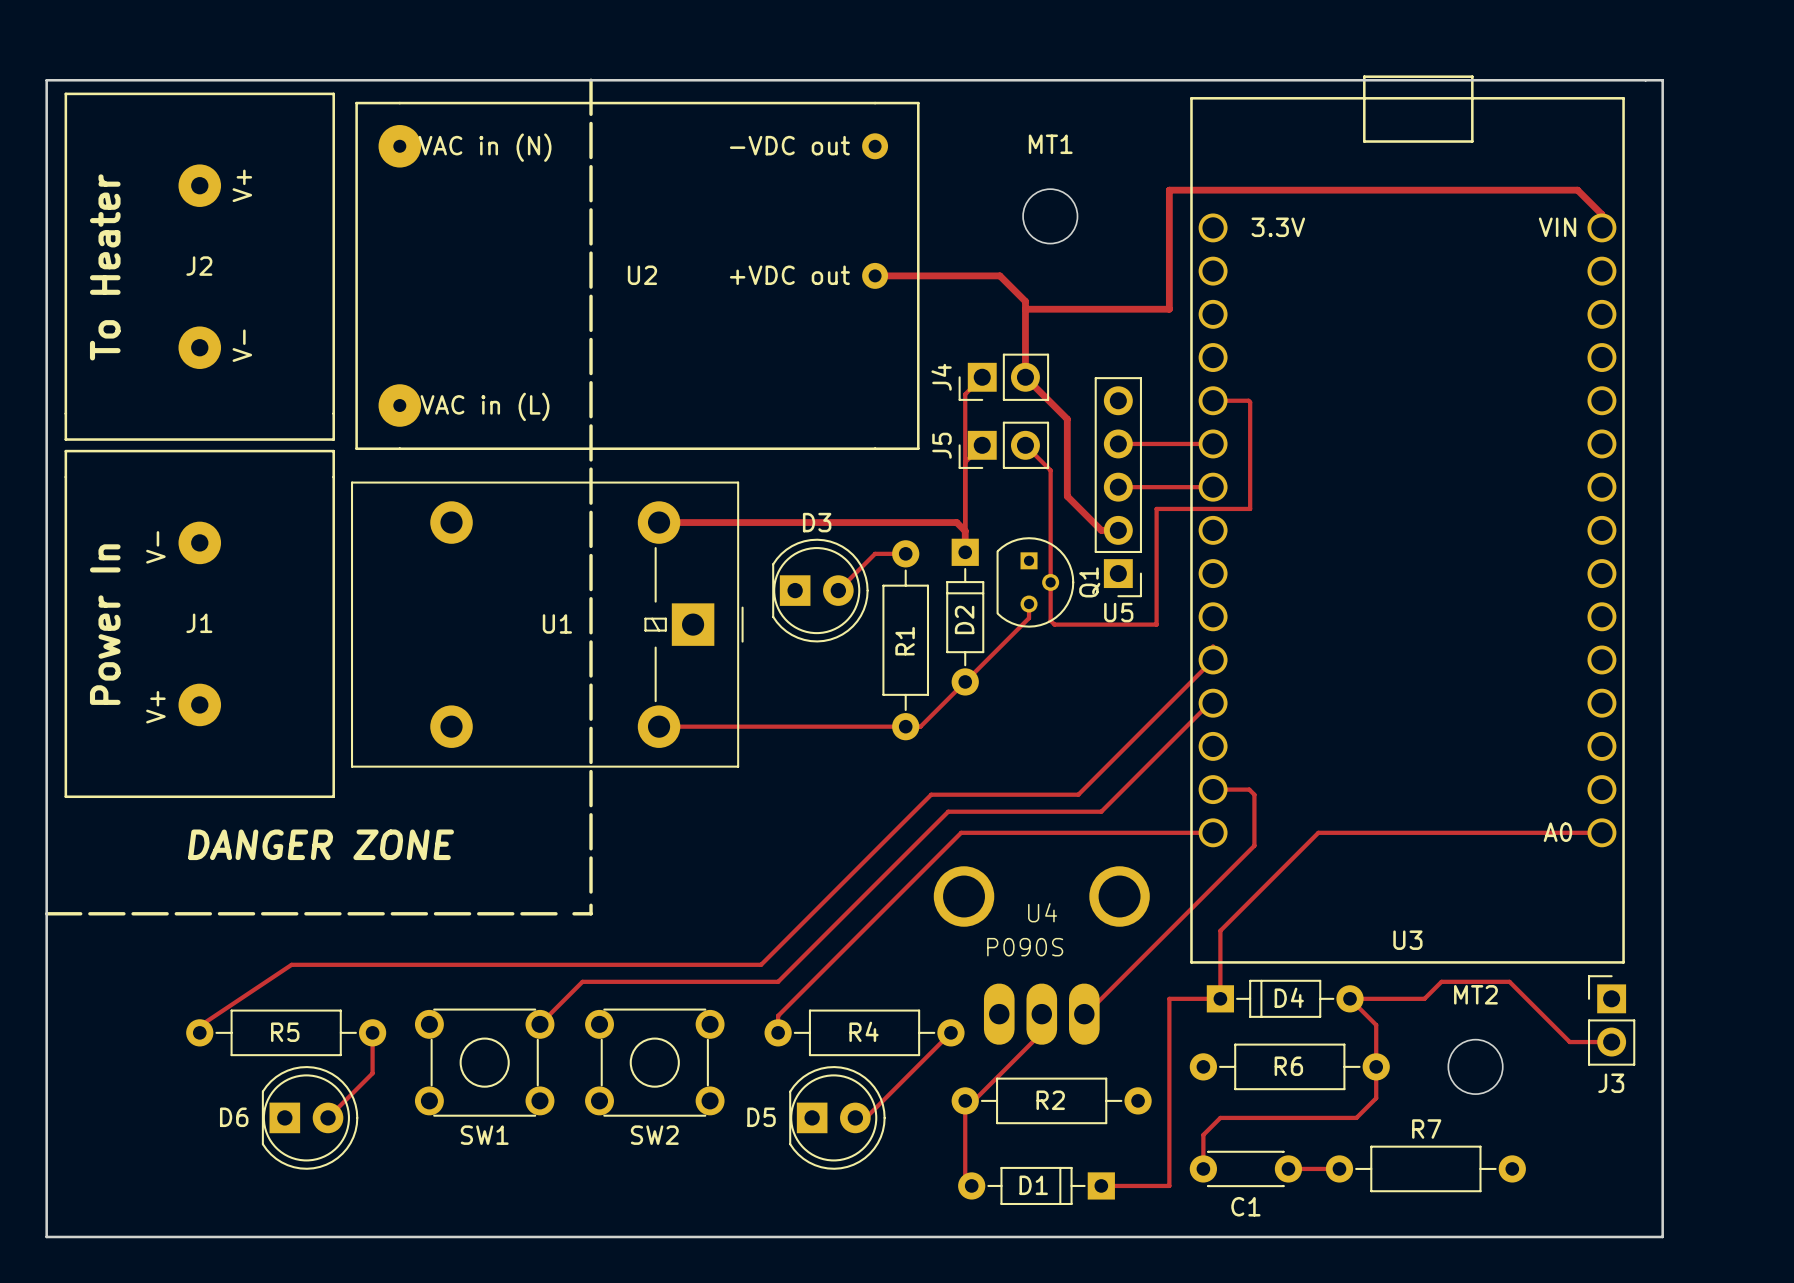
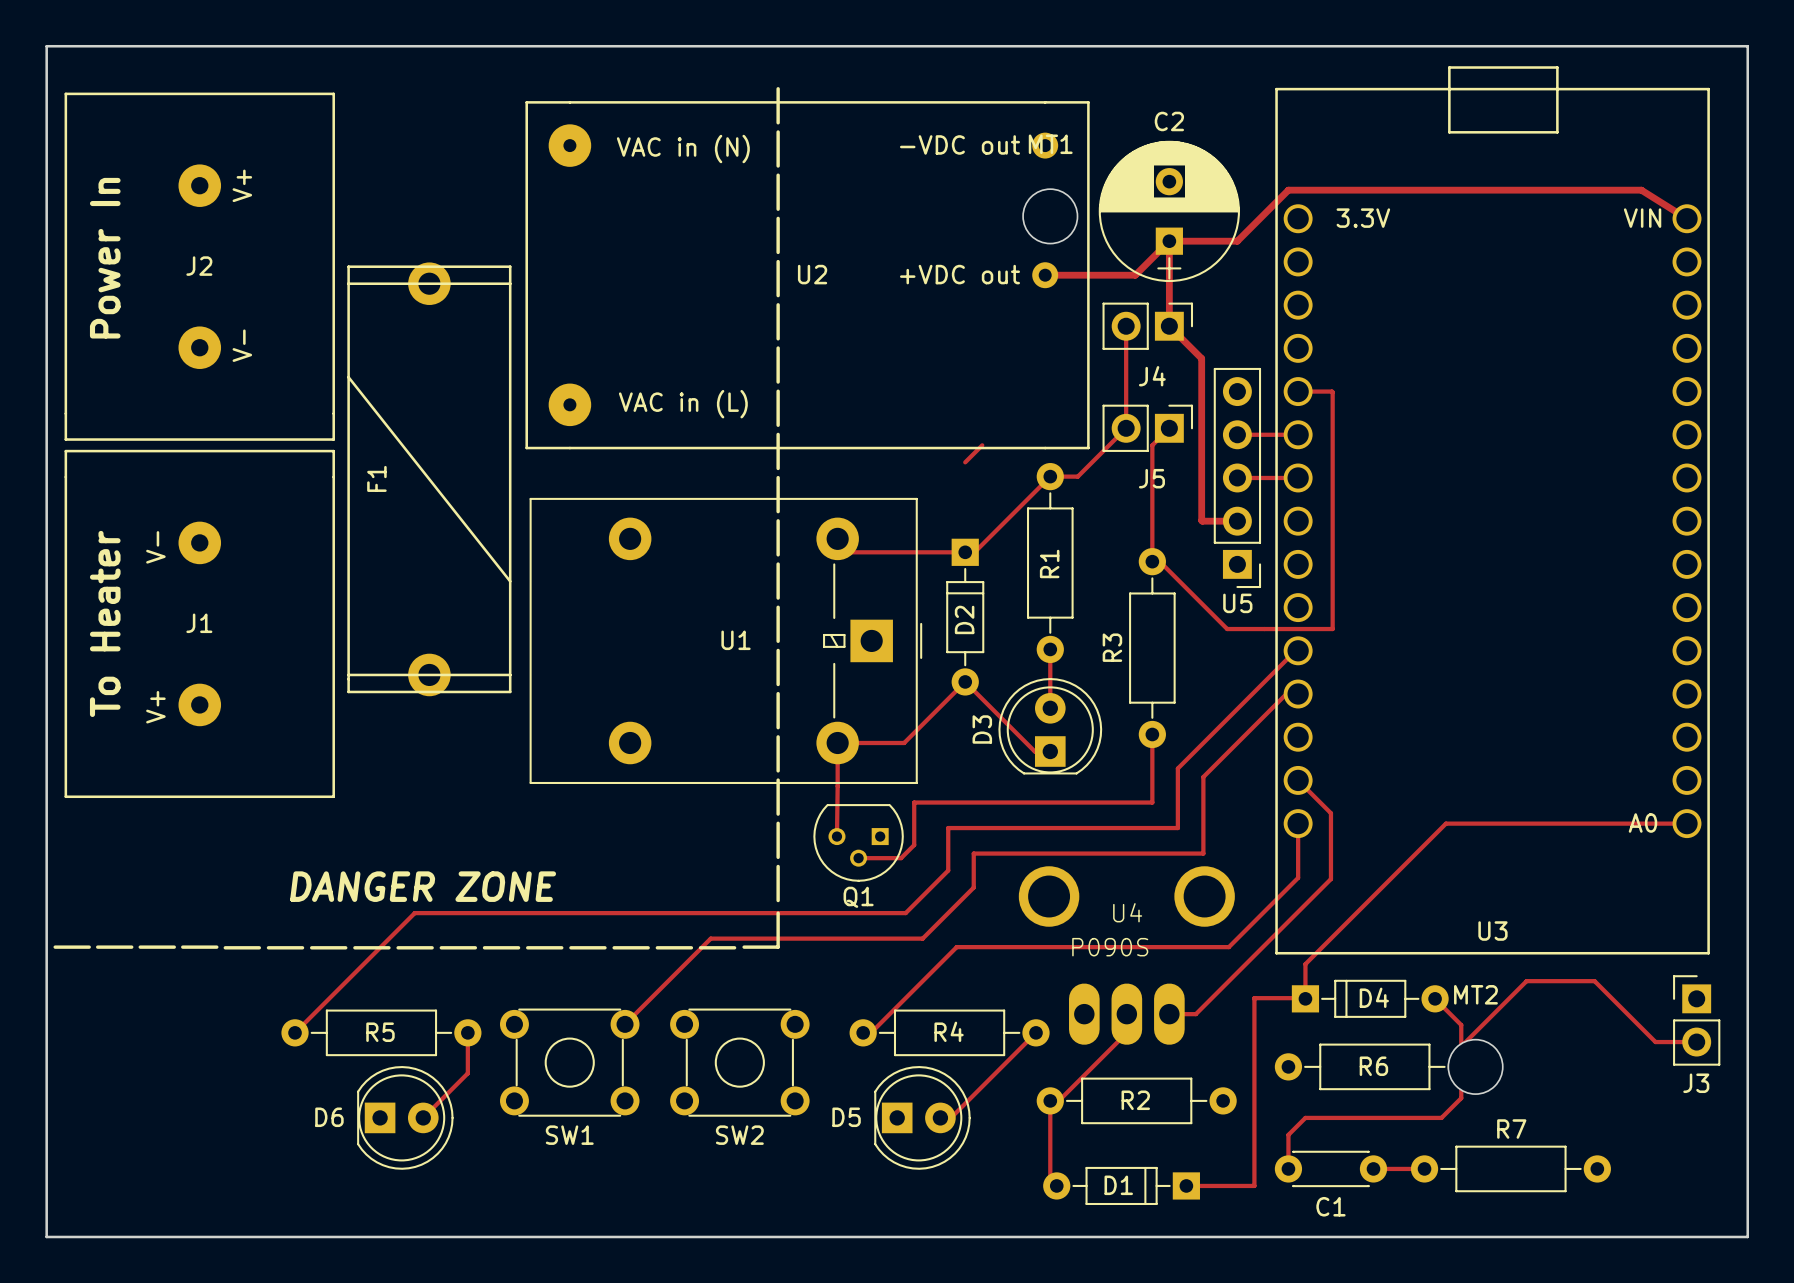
board edge: (46, 80) (1662, 80) (1662, 1236) -> (46, 80) (46, 46) (1747, 46) (1747, 1236) (1662, 1236)
line: (591, 80) (591, 114) -> (778, 88) (778, 122)
line: (591, 123) (591, 157) -> (778, 131) (778, 166)
U2 text position: VAC in (N) (485, 147) -> VAC in (N) (683, 149)
line: (591, 166) (591, 200) -> (778, 175) (778, 209)
track: (1288, 190) (1169, 190) (1169, 241) -> (1288, 190) (1237, 241) (1169, 241) (1135, 275) (1045, 275)
track: (1577, 190) (1601, 214) (1601, 227) -> (1577, 190) (1641, 190) (1687, 218)
line: (591, 209) (591, 243) -> (778, 218) (778, 252)
C2: none -> (1169, 211)
line: (591, 253) (591, 287) -> (778, 261) (778, 295)
text: To Heater (105, 267) -> Power In (105, 258)
U2 position: (637, 275) -> (807, 275)
track: (875, 275) (999, 275) (1025, 301) (1025, 377) (1067, 419) (1067, 496) (1101, 530) (1118, 530) -> none
line: (591, 296) (591, 330) -> (778, 304) (778, 338)
track: (1025, 309) (1169, 309) -> (1237, 521) (1201, 520) (1201, 358) (1169, 326) (1169, 309)
track: none -> (1126, 326) (1126, 428) (1077, 476) (1050, 476) (974, 552) (851, 552) (837, 538)
line: (591, 339) (591, 373) -> (778, 348) (778, 382)
J4 name position: J4 (941, 377) -> J4 (1152, 376)
track: (982, 377) (965, 394) (965, 552) (965, 531) (956, 522) (659, 522) -> none
J4 rotation: 0° (1003, 377) -> 180° (1147, 326)
J4 position: (1003, 377) -> (1147, 326)
line: (591, 382) (591, 416) -> (778, 391) (778, 425)
track: none -> (1298, 386) (1298, 391) (1332, 392) (1332, 629) (1227, 629) (1159, 561) (1152, 561) (1152, 445) (1169, 428)
track: (1213, 400) (1250, 402) (1250, 508) (1156, 508) (1156, 624) (1054, 624) (1050, 620) (1050, 470) (1025, 445) -> none
U2 text position: VAC in (L) (485, 406) -> VAC in (L) (683, 404)
line: (591, 425) (591, 459) -> (778, 434) (778, 468)
track: none -> (1237, 434) (1298, 434)
track: (1118, 443) (1213, 443) -> none
J5 name position: J5 (941, 445) -> J5 (1151, 478)
J5 rotation: 0° (1003, 445) -> 180° (1147, 428)
J5 position: (1003, 445) -> (1147, 428)
line: (591, 469) (591, 503) -> (778, 477) (778, 511)
track: none -> (1237, 477) (1298, 477)
F1: none -> (429, 479)
track: (1118, 487) (1213, 487) -> none
U5 position: (1118, 487) -> (1237, 477)
line: (591, 512) (591, 546) -> (778, 520) (778, 554)
U3 position: (1407, 519) -> (1492, 510)
track: (905, 553) (875, 553) (838, 590) -> none
line: (591, 555) (591, 589) -> (778, 564) (778, 598)
Q1 rotation: 0° (1035, 582) -> 90° clockwise (858, 842)
Q1 position: (1035, 582) -> (858, 842)
D3 rotation: 0° (820, 590) -> 90° counterclockwise (1050, 726)
D3 position: (820, 590) -> (1050, 726)
line: (591, 598) (591, 632) -> (778, 607) (778, 641)
track: (1029, 604) (1029, 618) (965, 681) -> (1059, 760) (1050, 751) (1034, 751) (965, 681)
text: Power In (105, 624) -> To Heater (105, 623)
U1 position: (547, 624) -> (725, 640)
R1 position: (905, 640) -> (1050, 563)
line: (591, 641) (591, 675) -> (778, 650) (778, 684)
track: (1213, 646) (1213, 659) (1078, 794) (931, 794) (761, 964) (291, 964) (199, 1026) -> none
R3: none -> (1152, 648)
track: none -> (1050, 649) (1050, 708)
track: none -> (1298, 650) (1295, 650) (1177, 768) (1177, 828) (948, 828) (948, 870) (905, 913) (414, 913) (295, 1032)
line: (591, 685) (591, 719) -> (778, 693) (778, 727)
track: none -> (1298, 694) (1286, 694) (1203, 777) (1203, 853) (973, 853) (973, 887) (922, 938) (710, 938) (625, 1024)
track: (1213, 703) (1209, 703) (1101, 811) (948, 811) (778, 981) (582, 981) (539, 1024) -> none
track: (659, 726) (920, 726) -> (836, 836) (837, 743) (904, 743) (920, 726)
line: (591, 728) (591, 762) -> (778, 736) (778, 770)
track: none -> (1152, 734) (1152, 802) (914, 802) (914, 845) (901, 858) (858, 858)
line: (591, 771) (591, 805) -> (778, 780) (778, 814)
track: none -> (1298, 780) (1330, 813) (1330, 879) (1195, 1014) (1160, 1014)
track: (1207, 794) (1213, 789) (1249, 789) (1254, 794) (1254, 845) (1086, 1014) (1075, 1014) -> none
line: (591, 814) (591, 848) -> (778, 823) (778, 857)
track: none -> (1687, 823) (1445, 823) (1305, 964) (1305, 998) (1254, 998) (1254, 1185) (1186, 1185)
track: none -> (1298, 824) (1298, 877) (1228, 947) (956, 947) (871, 1032) (863, 1032)
track: (1601, 832) (1318, 832) (1220, 930) (1220, 998) (1169, 998) (1169, 1185) (1101, 1185) -> none
track: (1213, 833) (961, 832) (778, 1015) (778, 1032) -> none
text position: DANGER ZONE (321, 844) -> DANGER ZONE (423, 886)
line: (591, 857) (591, 892) -> (778, 866) (778, 900)
line: (591, 905) (591, 913) (574, 913) -> none
line: (46, 913) (80, 913) -> (225, 947) (259, 947)
line: (89, 913) (123, 913) -> (268, 947) (302, 947)
line: (133, 913) (167, 913) -> (311, 947) (345, 947)
line: (176, 913) (210, 913) -> (354, 947) (388, 947)
line: (219, 913) (253, 913) -> (398, 947) (432, 947)
line: (262, 913) (296, 913) -> (441, 947) (475, 947)
line: (305, 913) (339, 913) -> (484, 947) (518, 947)
line: (349, 913) (383, 913) -> (527, 947) (561, 947)
line: (392, 913) (426, 913) -> (570, 947) (604, 947)
line: (435, 913) (469, 913) -> (614, 947) (648, 947)
line: (478, 913) (512, 913) -> (657, 947) (691, 947)
line: (521, 913) (555, 913) -> (700, 947) (734, 947)
line: none -> (778, 913) (778, 947) (744, 947)
line: none -> (55, 947) (89, 947)
line: none -> (97, 947) (131, 947)
line: none -> (140, 947) (174, 947)
line: none -> (182, 947) (216, 947)
U4 position: (1041, 955) -> (1126, 955)
D4 position: (1285, 998) -> (1370, 998)
track: (1041, 1014) (1041, 1032) (973, 1100) (965, 1100) (965, 1179) (971, 1185) -> (1126, 1014) (1126, 1032) (1058, 1100) (1050, 1100) (1050, 1179) (1056, 1185)
J3 position: (1611, 1020) -> (1696, 1020)
R5 position: (286, 1032) -> (381, 1032)
track: (372, 1032) (372, 1073) (328, 1117) -> (467, 1032) (467, 1073) (423, 1117)
R4 position: (864, 1032) -> (949, 1032)
track: (950, 1032) (865, 1117) (855, 1117) -> (1036, 1032) (950, 1117) (940, 1117)
track: (1611, 1042) (1569, 1042) (1509, 981) (1441, 981) (1424, 998) (1350, 998) (1376, 1025) (1376, 1098) (1356, 1117) -> (1435, 998) (1461, 1025) (1461, 1098) (1441, 1117) (1356, 1117)
track: none -> (1696, 1042) (1655, 1042) (1594, 981) (1526, 981) (1461, 1046)
SW1 position: (484, 1062) -> (569, 1062)
SW2 position: (654, 1062) -> (739, 1062)
R6 position: (1289, 1066) -> (1374, 1066)
R2 position: (1051, 1100) -> (1136, 1100)
D6 position: (310, 1117) -> (405, 1117)
D5 position: (837, 1117) -> (922, 1117)
track: (1305, 1117) (1220, 1117) (1203, 1134) (1203, 1168) -> none
C1 position: (1245, 1168) -> (1330, 1168)
track: (1288, 1168) (1339, 1168) -> (1288, 1168) (1288, 1134) (1305, 1117)
track: none -> (1373, 1168) (1424, 1168)
R7 position: (1425, 1168) -> (1510, 1168)
D1 position: (1036, 1185) -> (1121, 1185)

